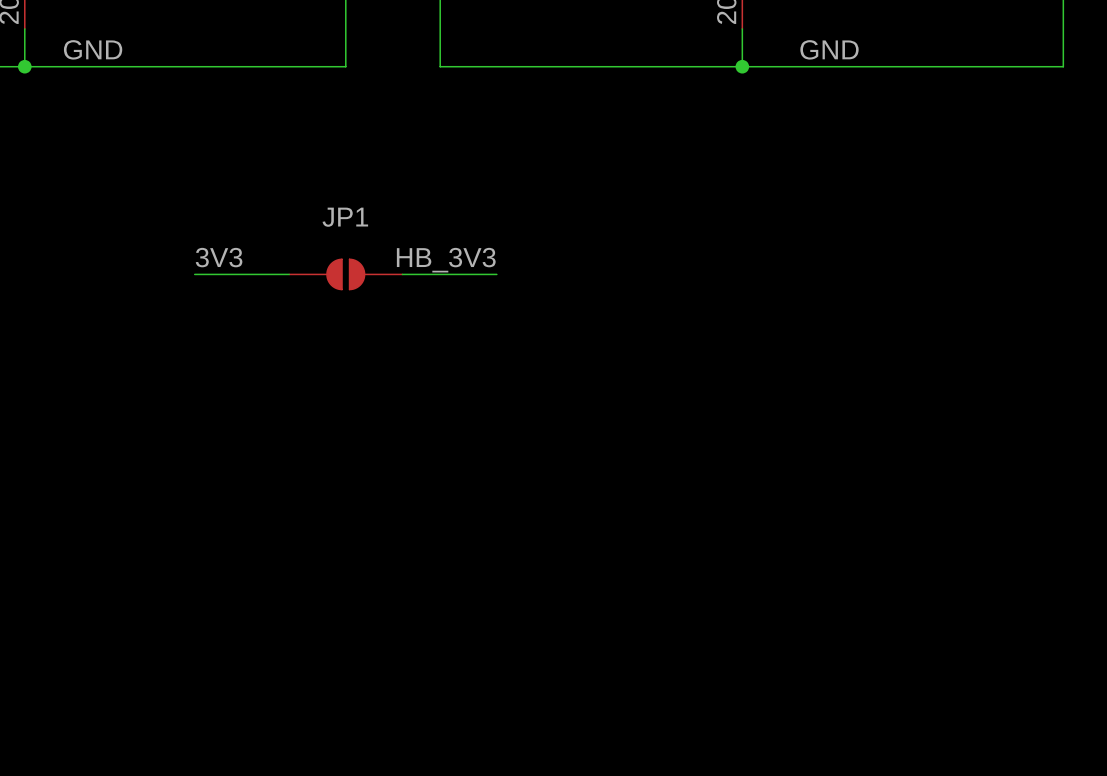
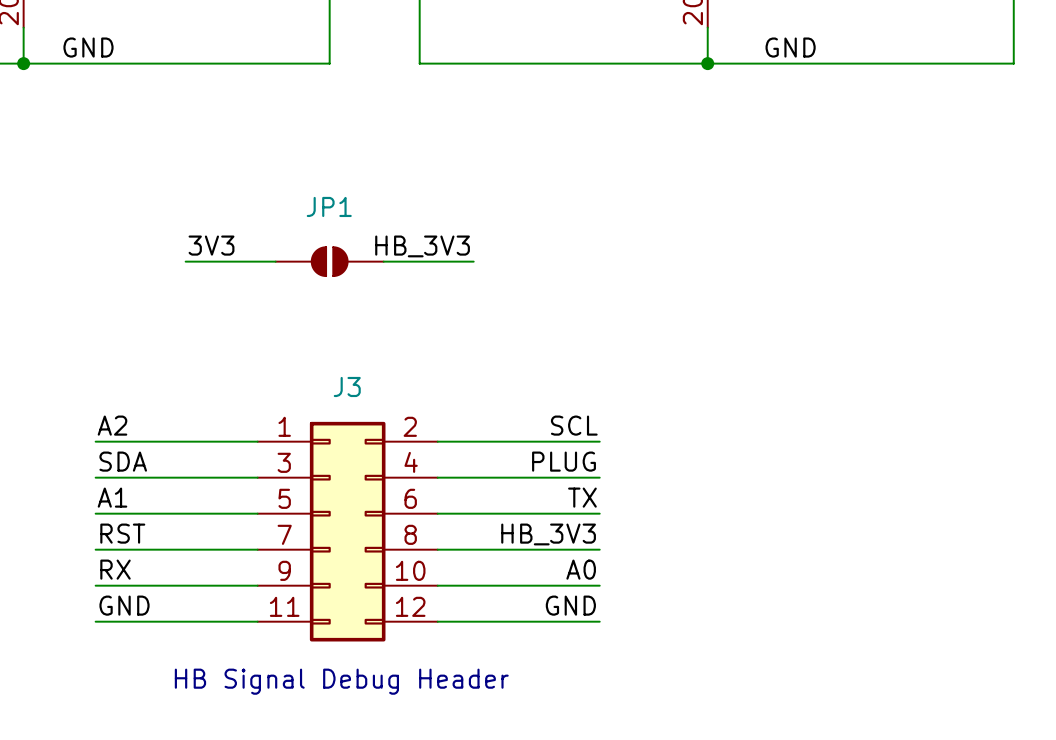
label: none -> A2 (112, 425)
label: none -> SCL (574, 425)
wire: none -> (95, 441) (257, 441)
wire: none -> (437, 441) (599, 441)
label: none -> SDA (123, 461)
label: none -> PLUG (564, 461)
wire: none -> (95, 477) (257, 477)
wire: none -> (437, 477) (599, 477)
label: none -> A1 (112, 497)
label: none -> TX (582, 497)
wire: none -> (95, 513) (257, 513)
wire: none -> (437, 513) (599, 513)
J3: none -> (347, 531)
label: none -> RST (122, 533)
label: none -> HB_3V3 (548, 534)
wire: none -> (95, 549) (257, 549)
wire: none -> (437, 549) (599, 549)
label: none -> RX (115, 569)
label: none -> A0 (581, 569)
wire: none -> (95, 585) (257, 585)
wire: none -> (437, 585) (599, 585)
label: none -> GND (124, 605)
label: none -> GND (570, 605)
wire: none -> (95, 621) (257, 621)
wire: none -> (437, 621) (599, 621)
text: none -> HB Signal Debug Header (341, 681)

